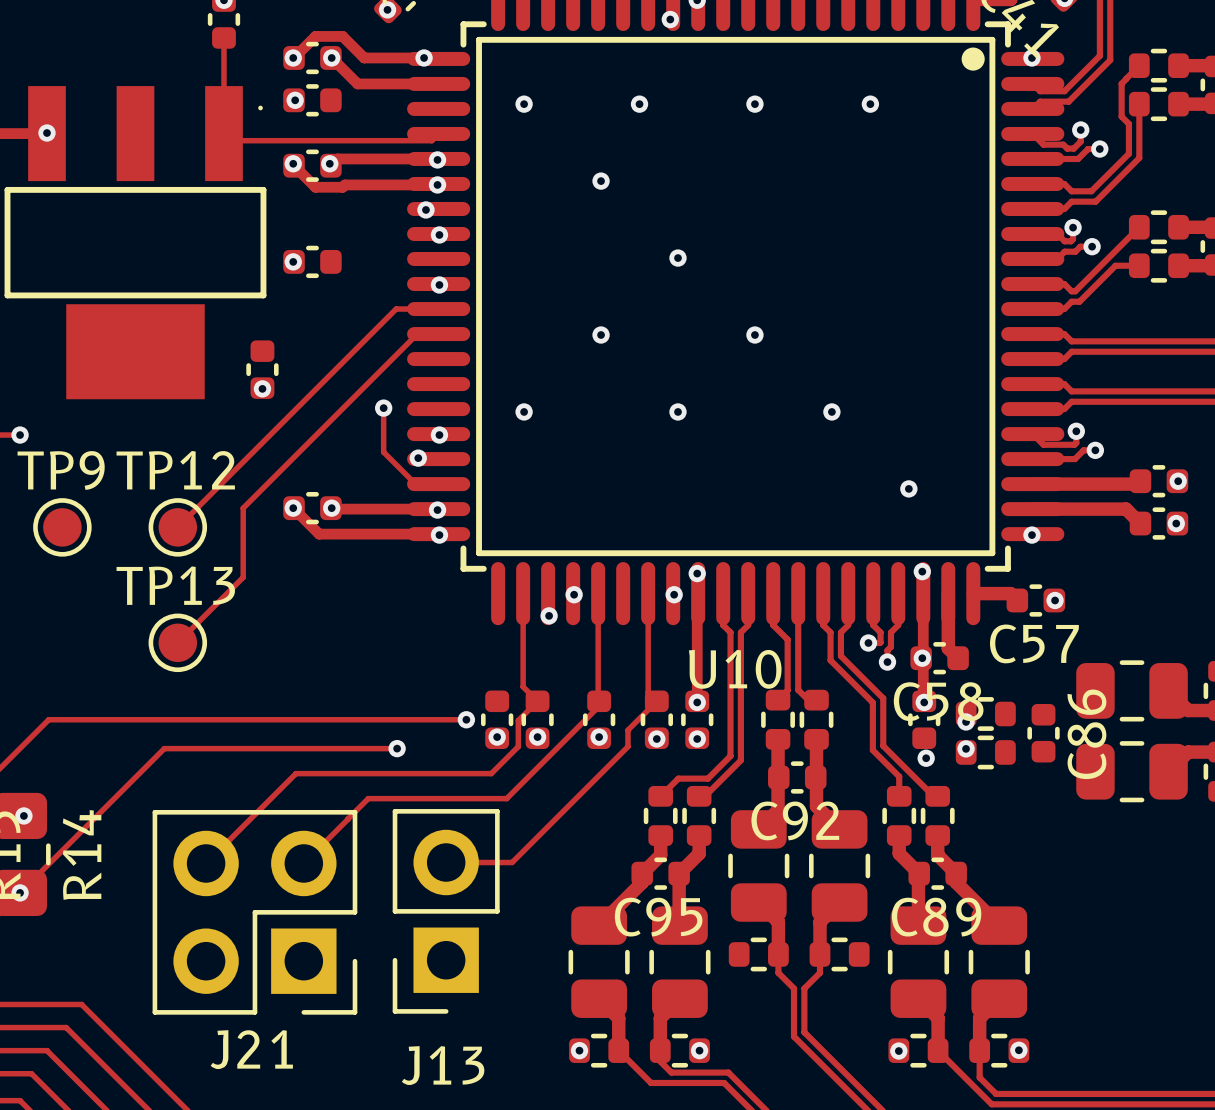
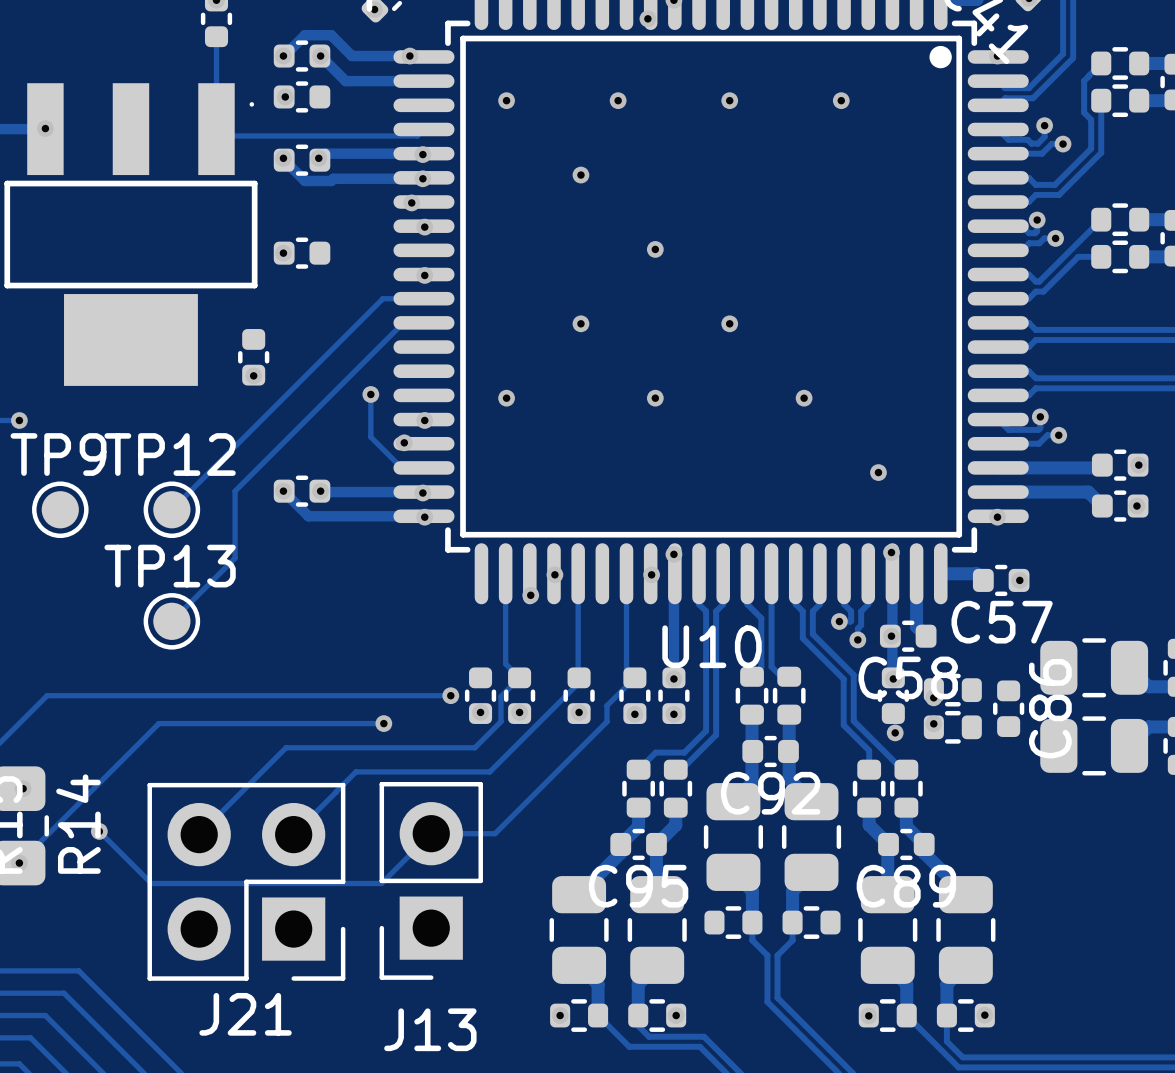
track: none -> (99, 831) (151, 883) (381, 883) (431, 833)
via: none -> (99, 831)

